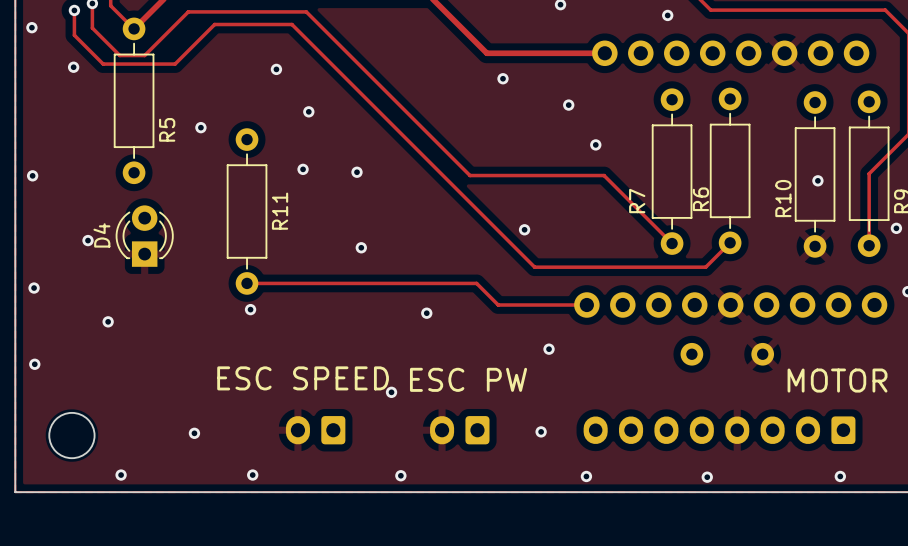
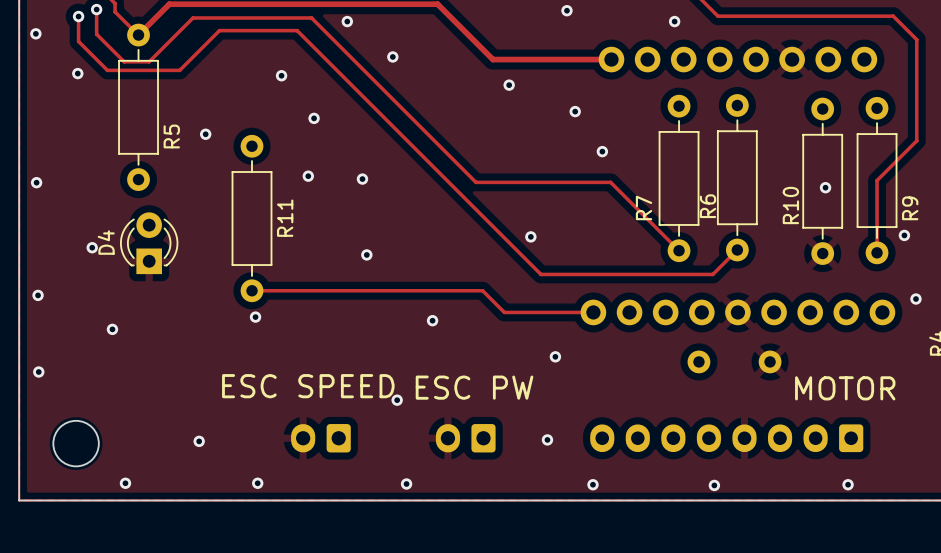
via: none -> (347, 21)
via: none -> (392, 56)

